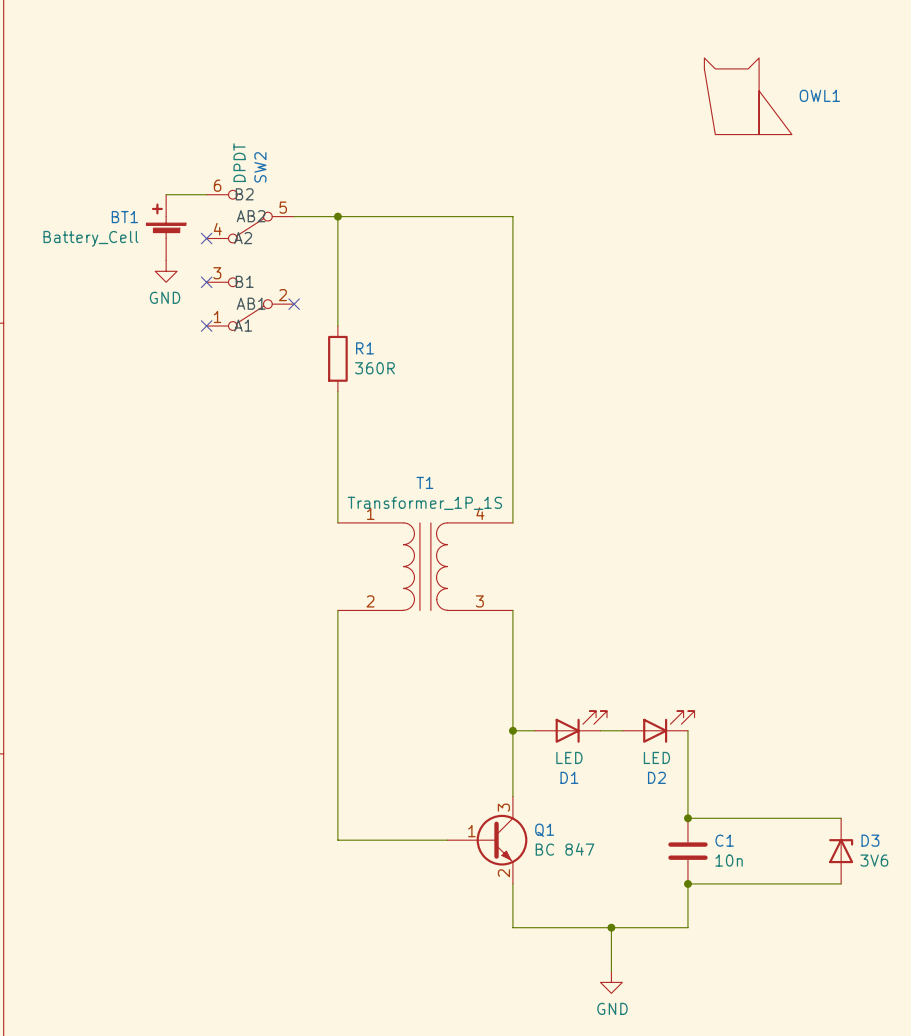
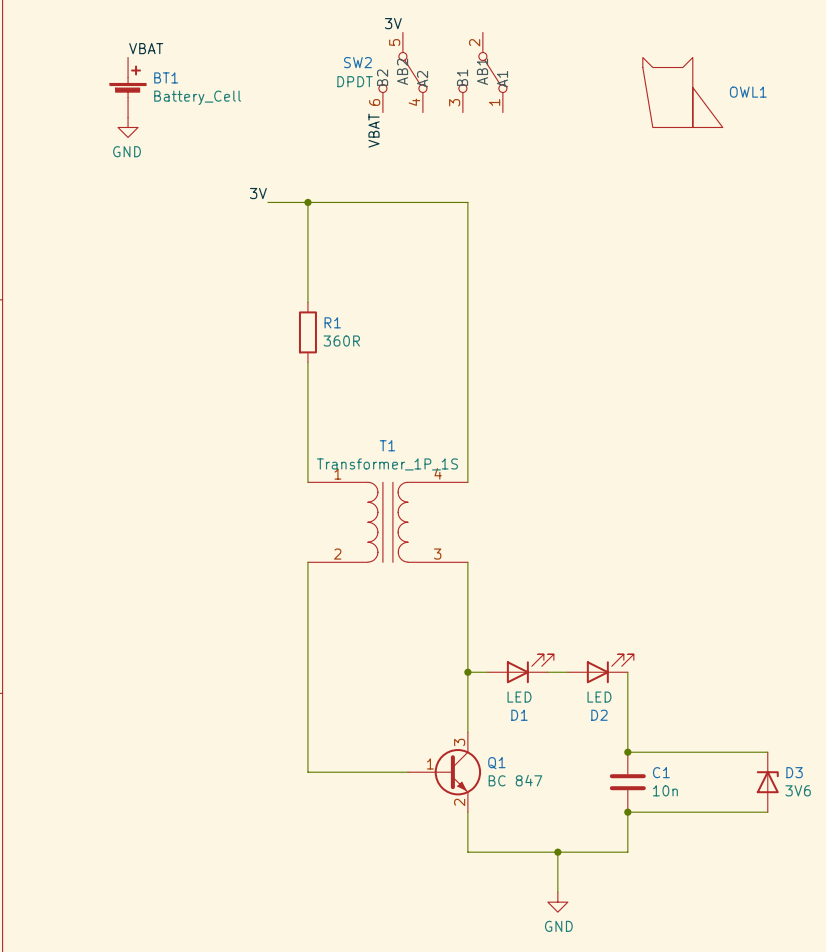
label: none -> 3V (393, 23)
label: none -> VBAT (146, 48)
label: none -> VBAT (374, 130)
wire: (166, 194) (206, 194) -> none
label: none -> 3V (258, 193)
BT1 flip: as is (166, 220) -> left-right (128, 81)
BT1 position: (166, 227) -> (128, 87)
no-connect mark: (206, 238) -> none
SW2 rotation: 0° (250, 260) -> 90° counterclockwise (442, 72)
SW2 position: (250, 260) -> (442, 72)
power symbol position: GND (166, 271) -> GND (128, 127)
no-connect mark: (206, 282) -> none
no-connect mark: (294, 304) -> none
no-connect mark: (206, 326) -> none

